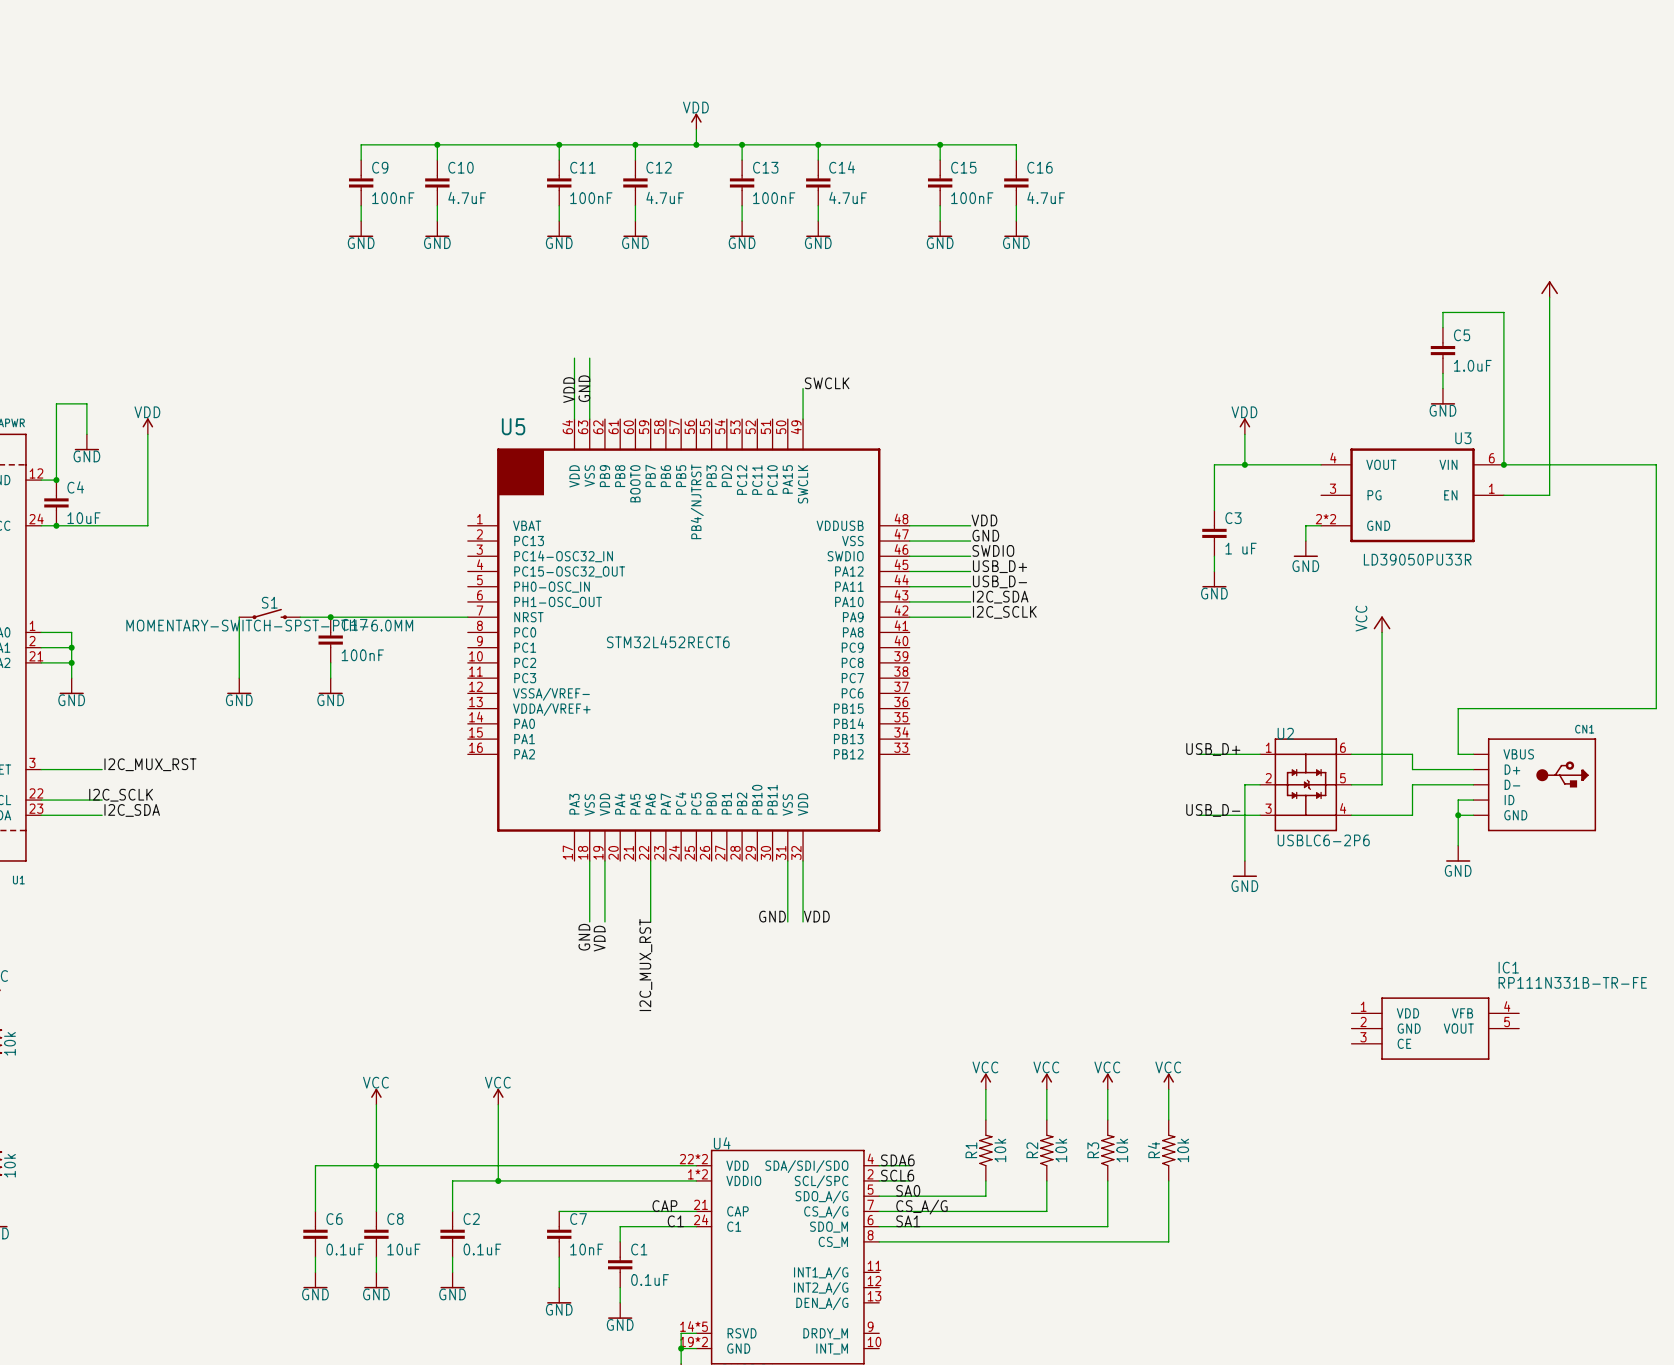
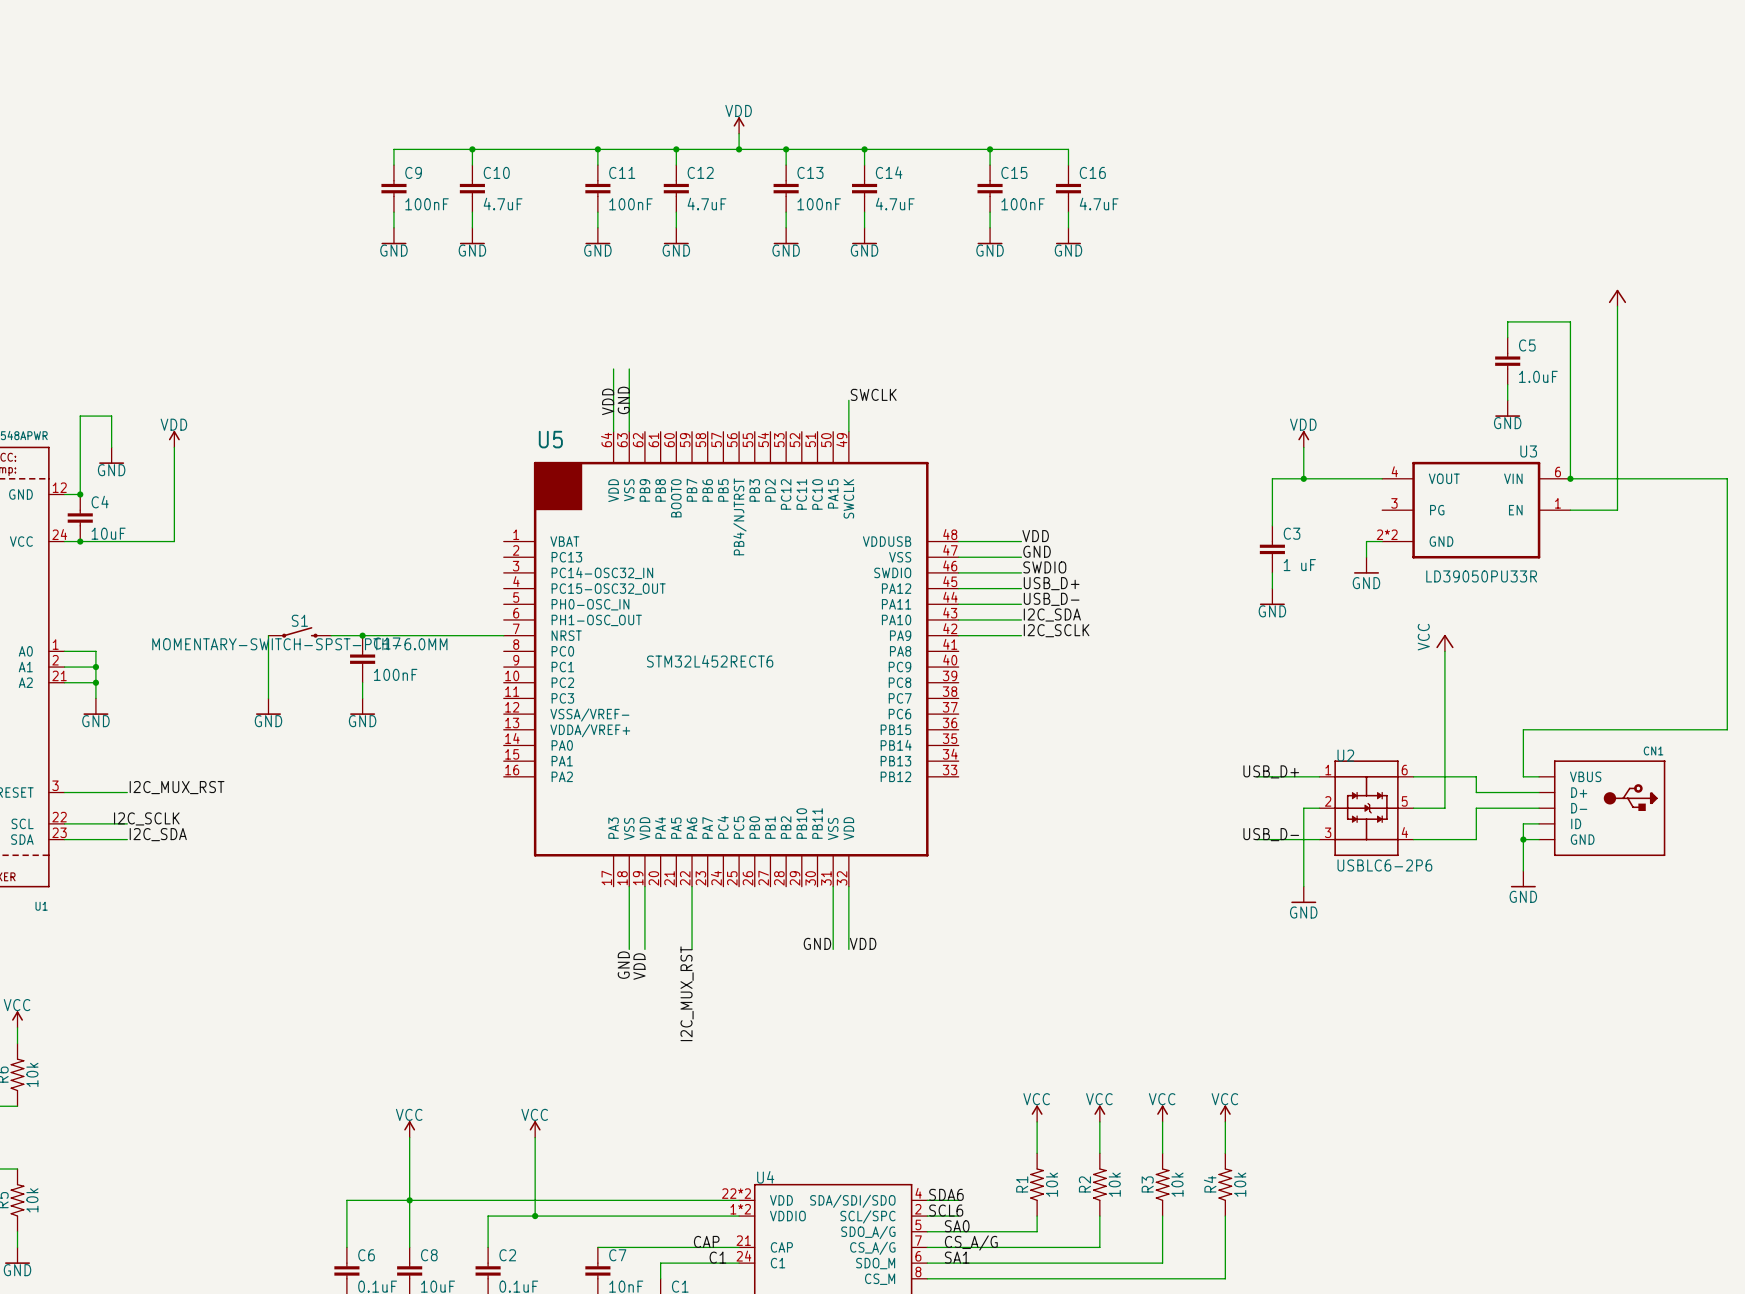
IC1: RP111N331B-TR-FE (1435, 1028) -> none

